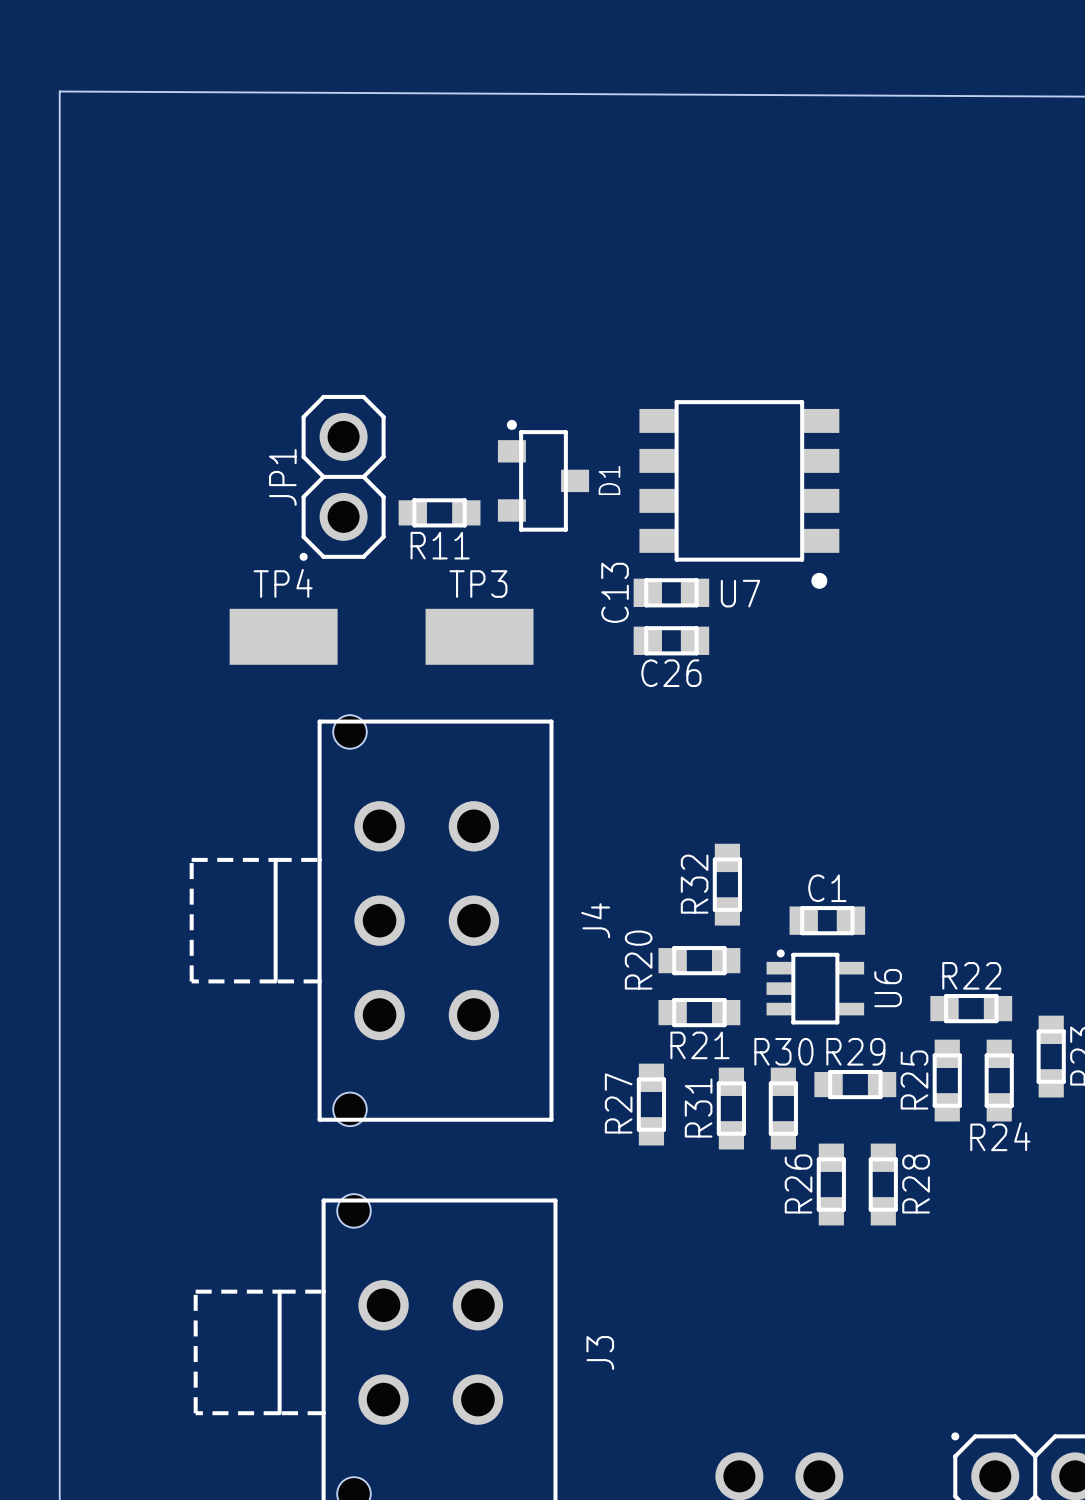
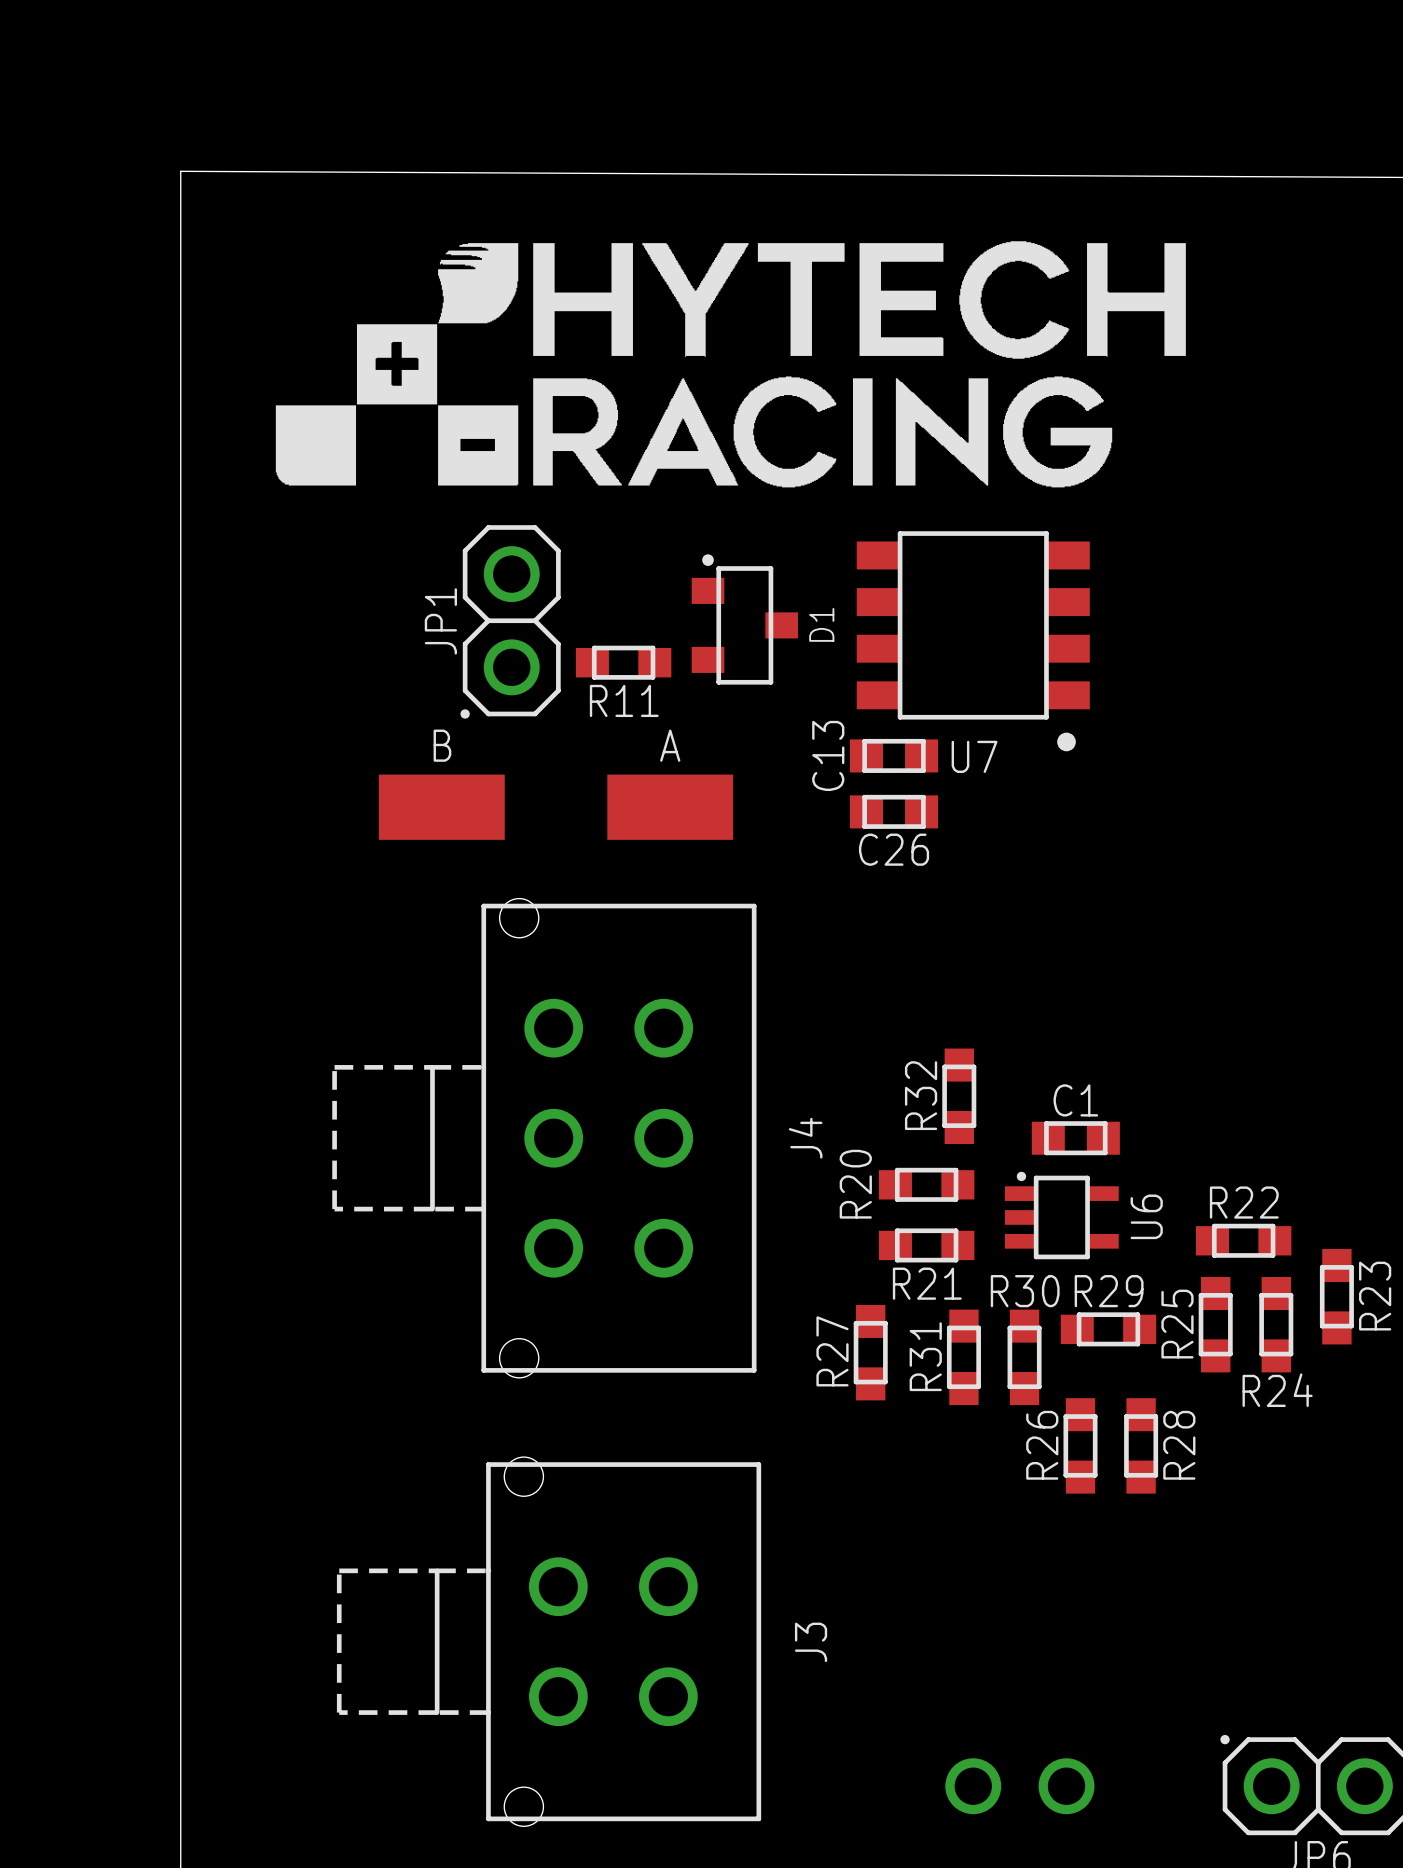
drawing: none -> [275, 241, 1186, 488]
TP4 name: TP4 (283, 583) -> B (442, 745)
TP3 name: TP3 (478, 584) -> A (670, 745)

